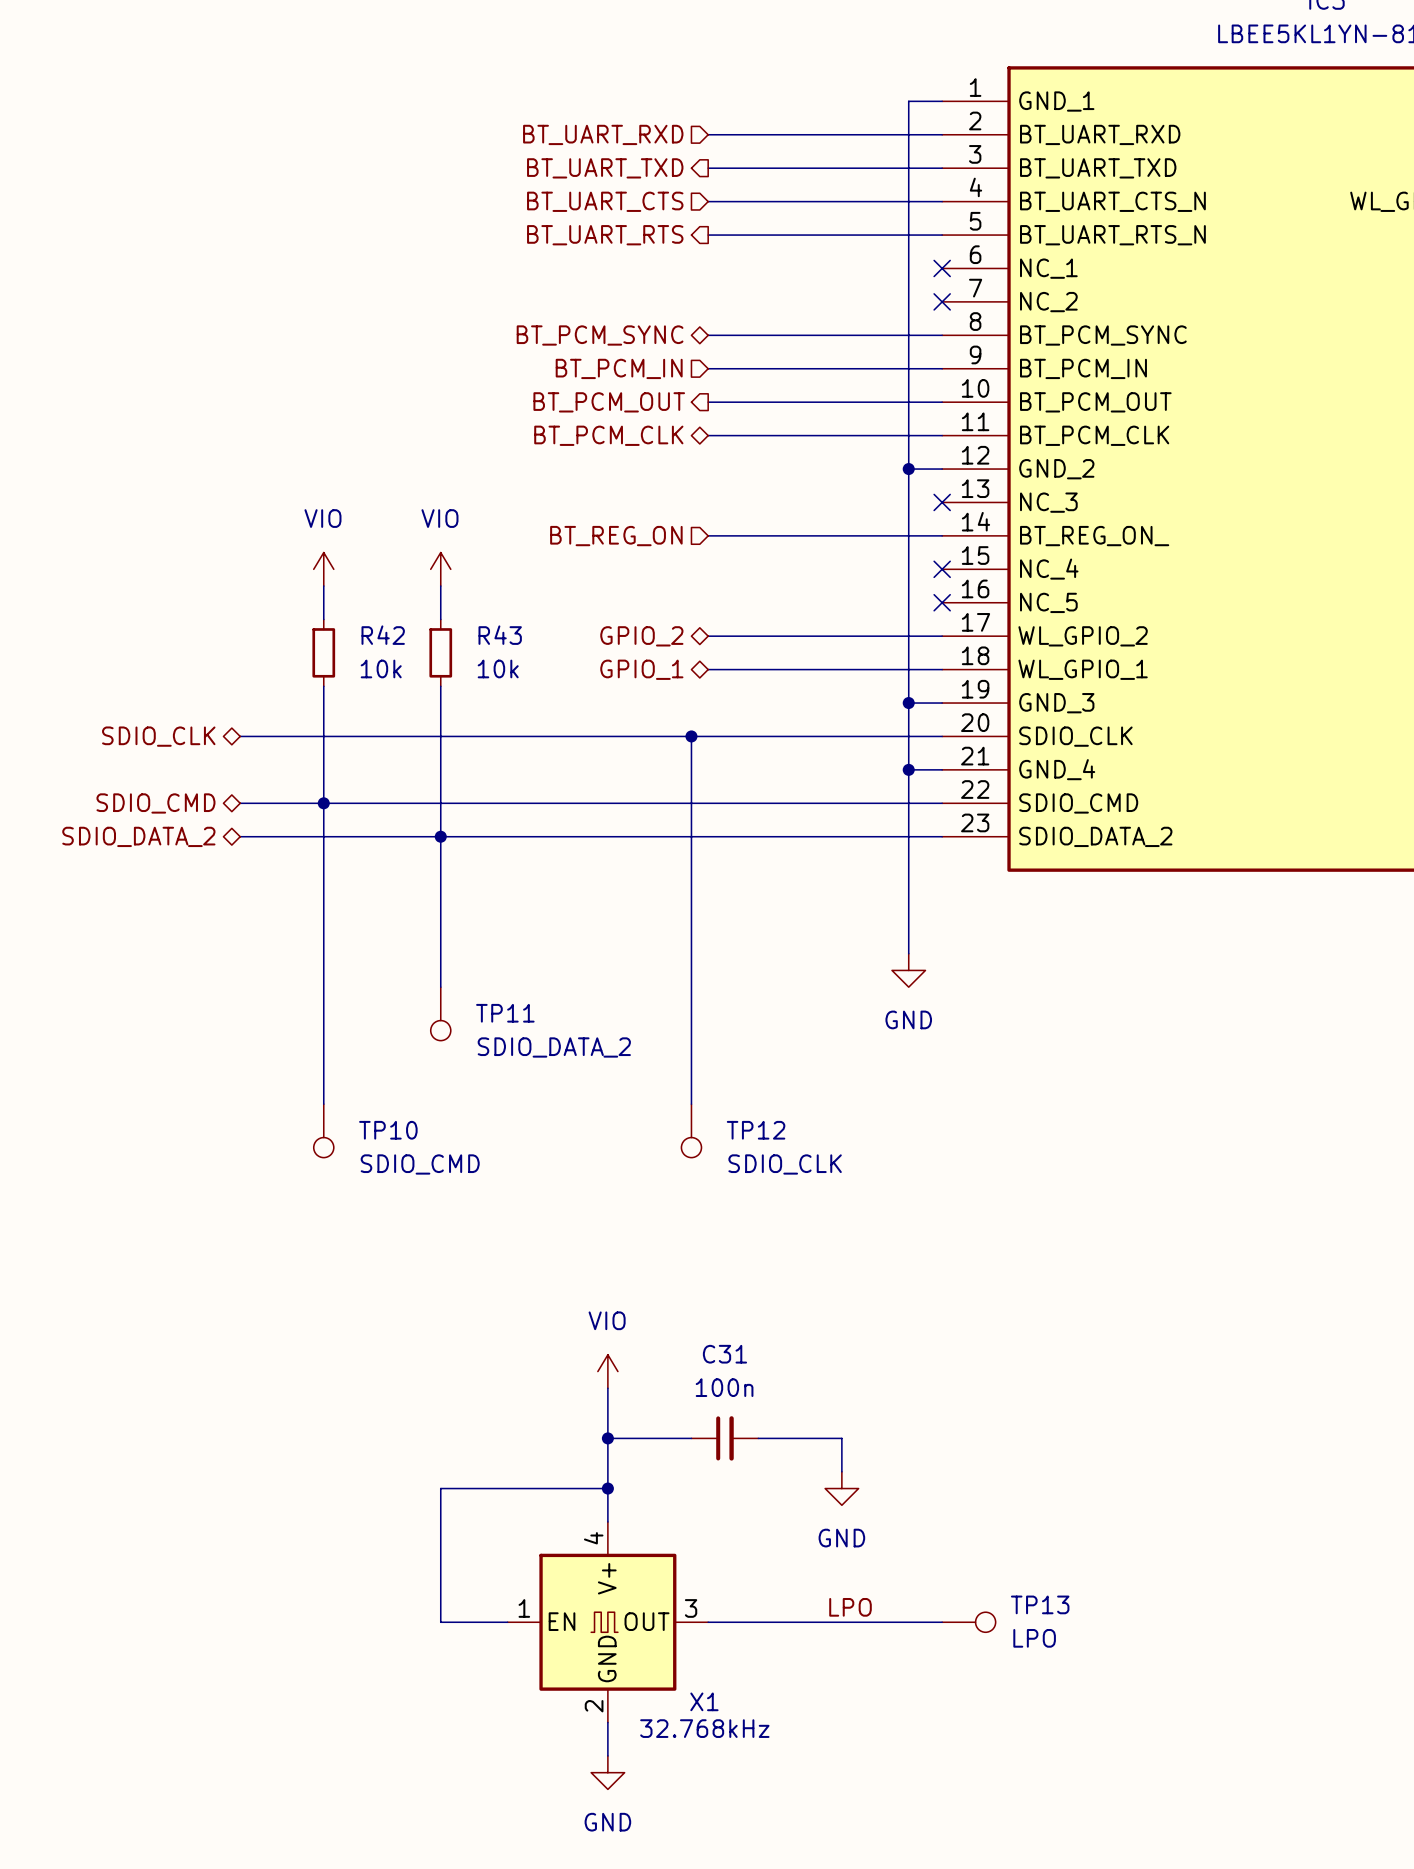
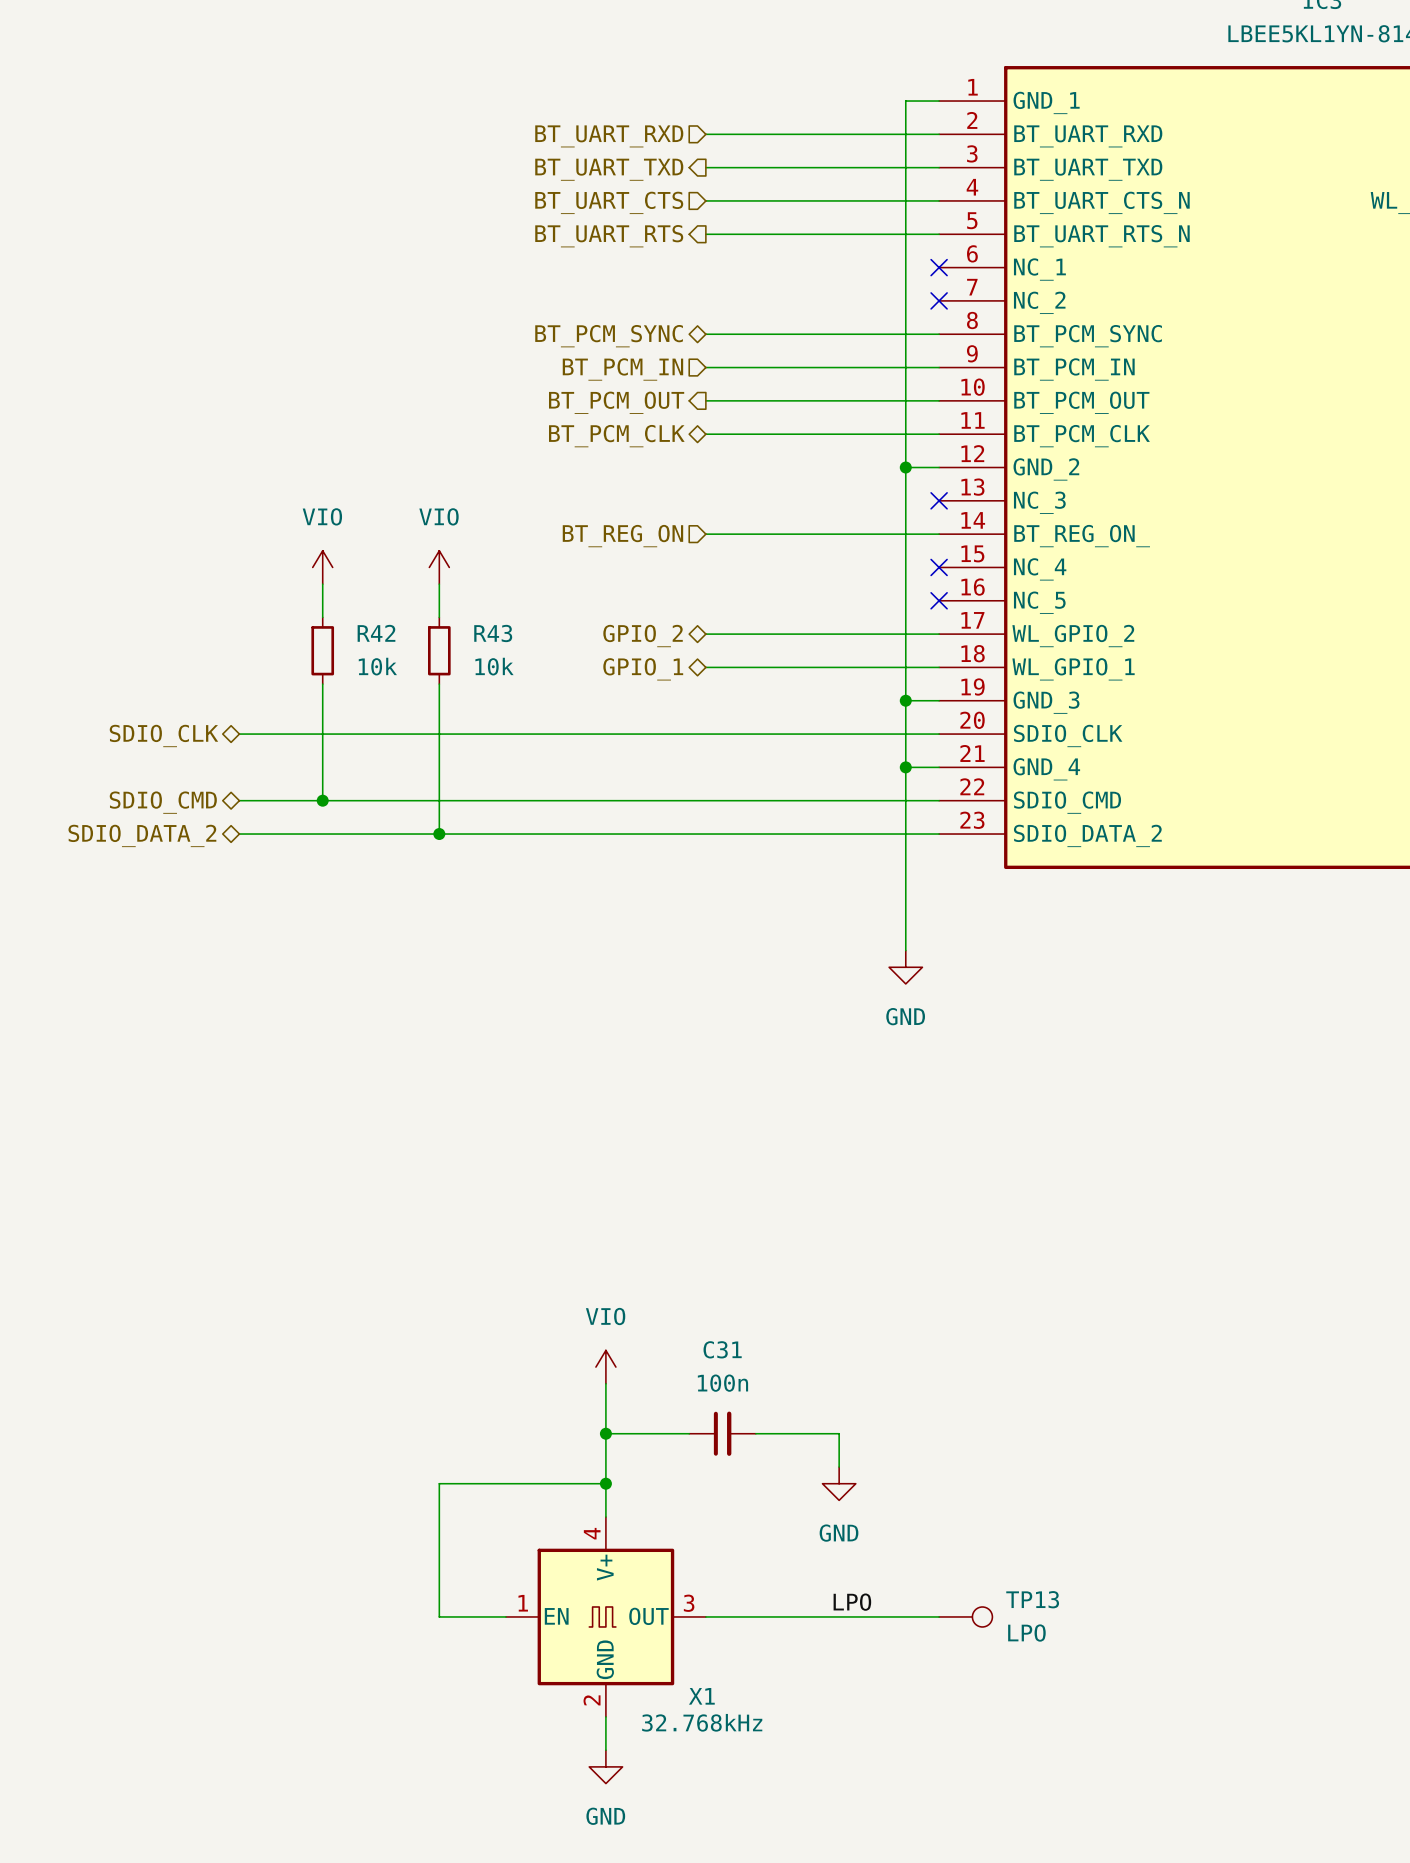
wire: (691, 736) (691, 1104) -> none
junction: (691, 736) -> none
wire: (323, 803) (323, 1104) -> none
wire: (440, 836) (440, 987) -> none
TP11: SDIO_DATA_2 (440, 1013) -> none
TP10: SDIO_CMD (323, 1130) -> none
TP12: SDIO_CLK (691, 1130) -> none

